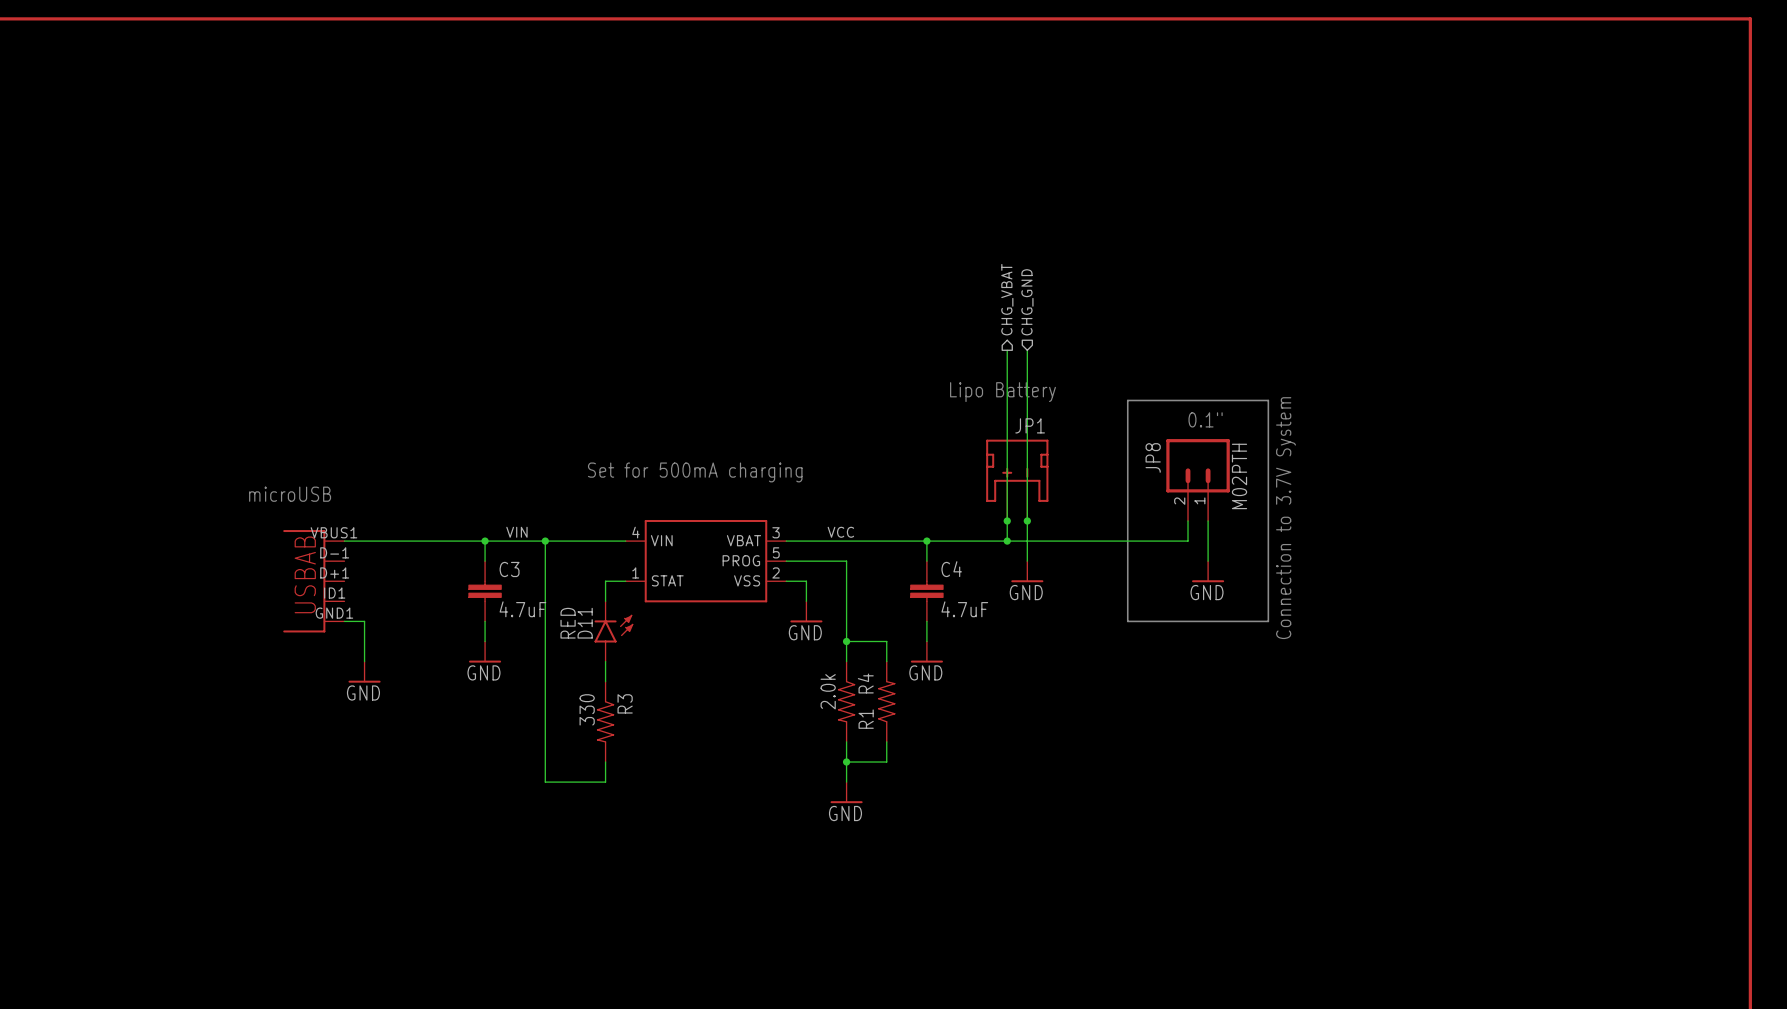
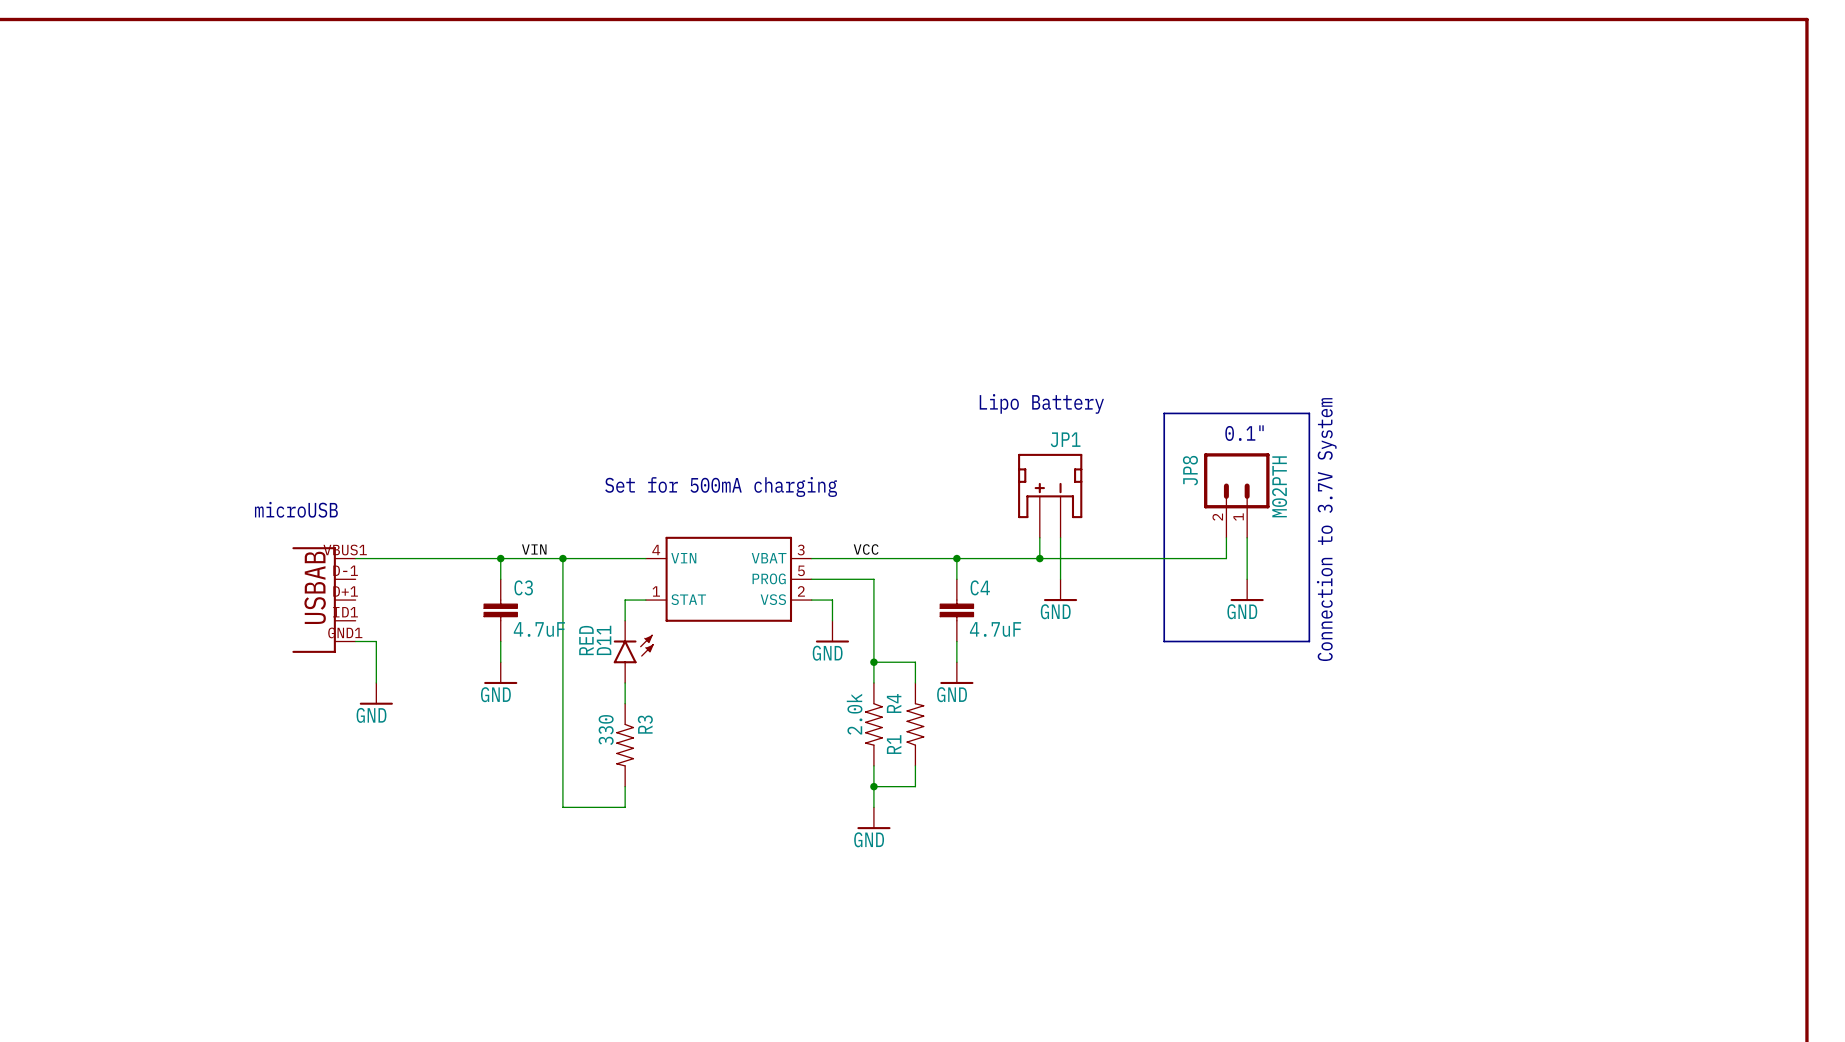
hierarchical label: CHG_VBAT (1007, 299) -> none
hierarchical label: CHG_GND (1027, 302) -> none
wire: (1007, 350) (1007, 520) -> none
wire: (1027, 350) (1027, 520) -> none
junction: (1007, 520) -> none
junction: (1027, 520) -> none

